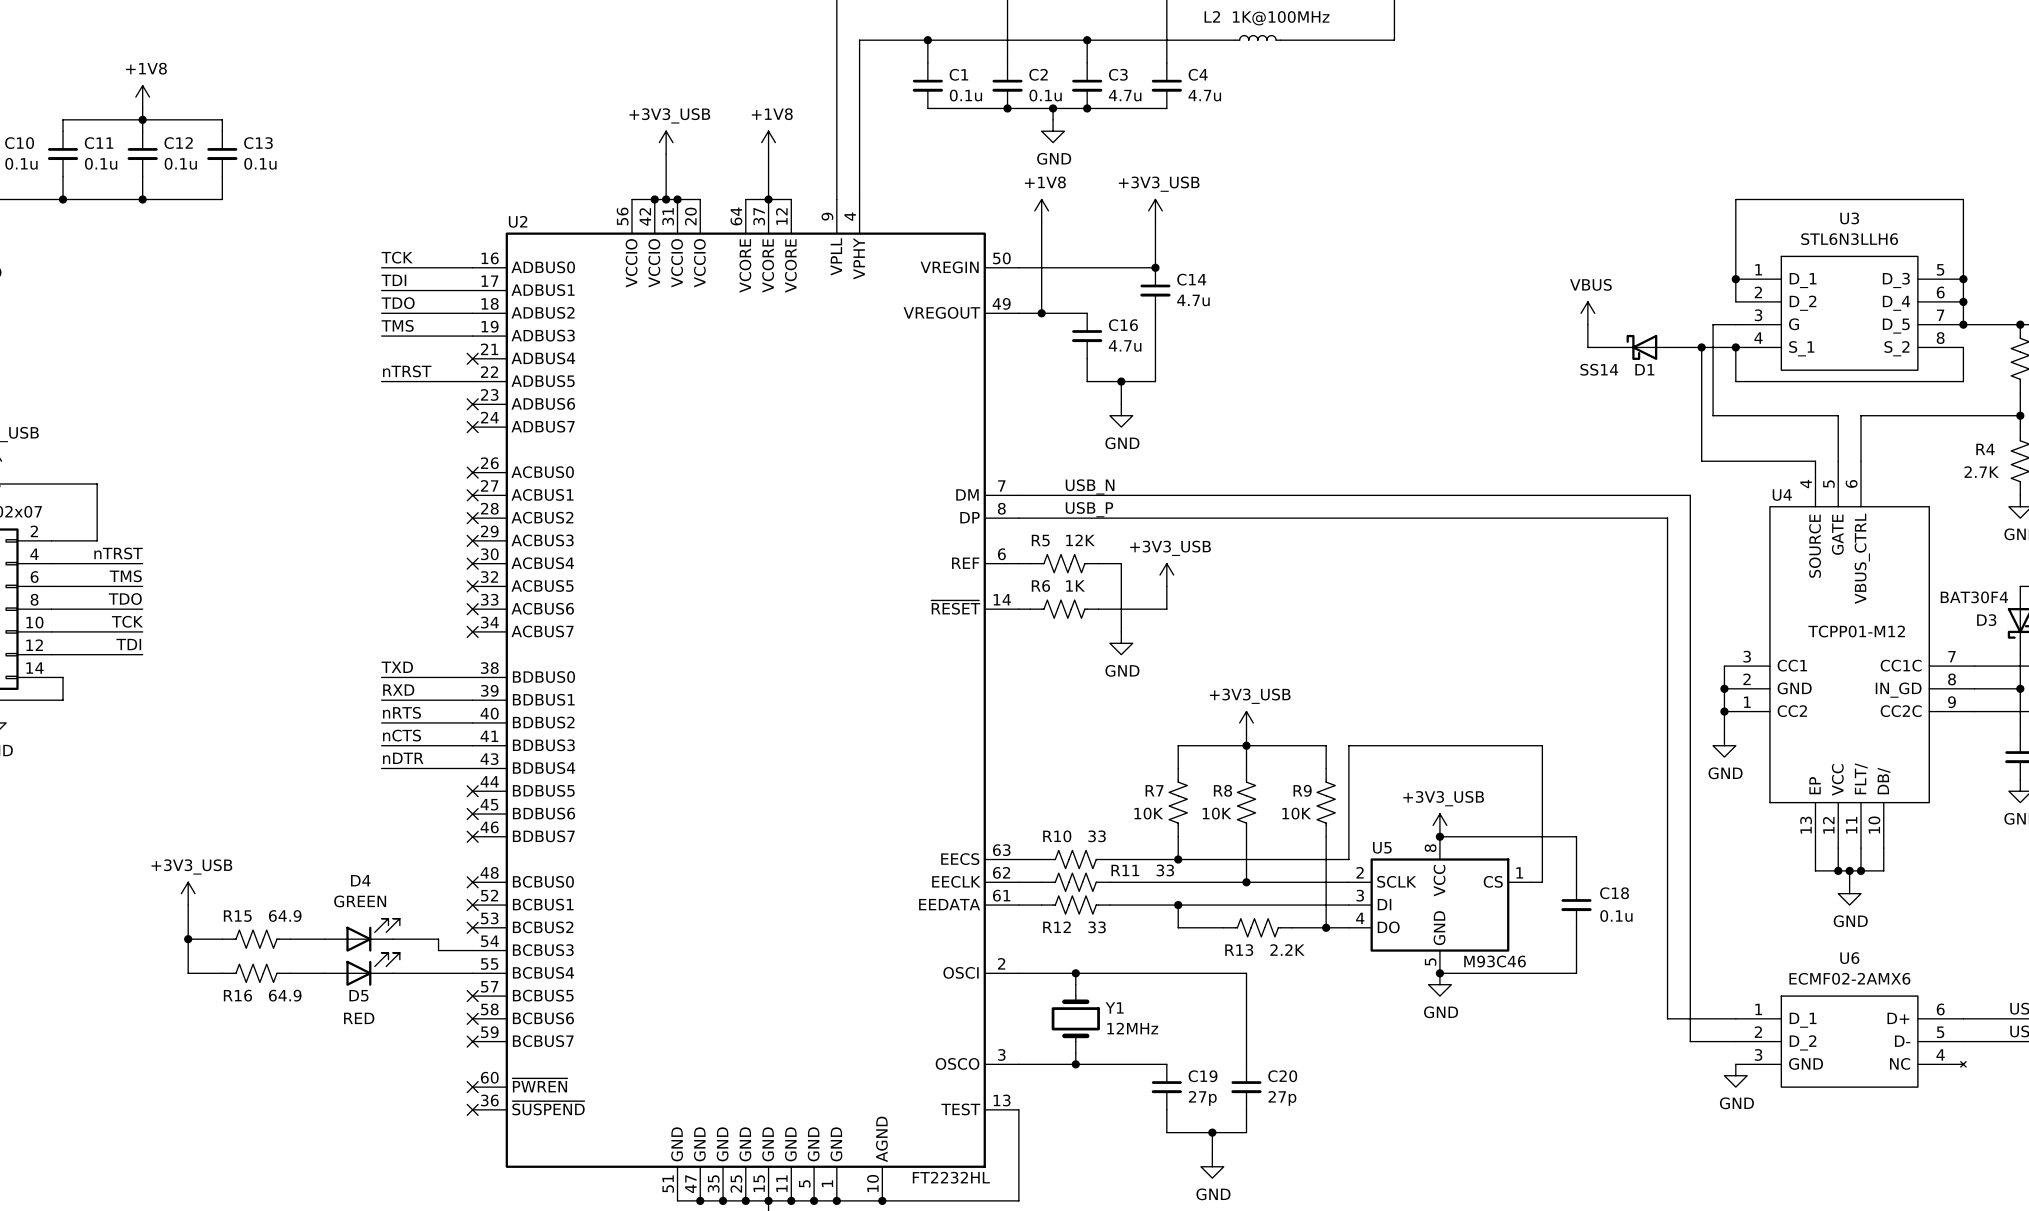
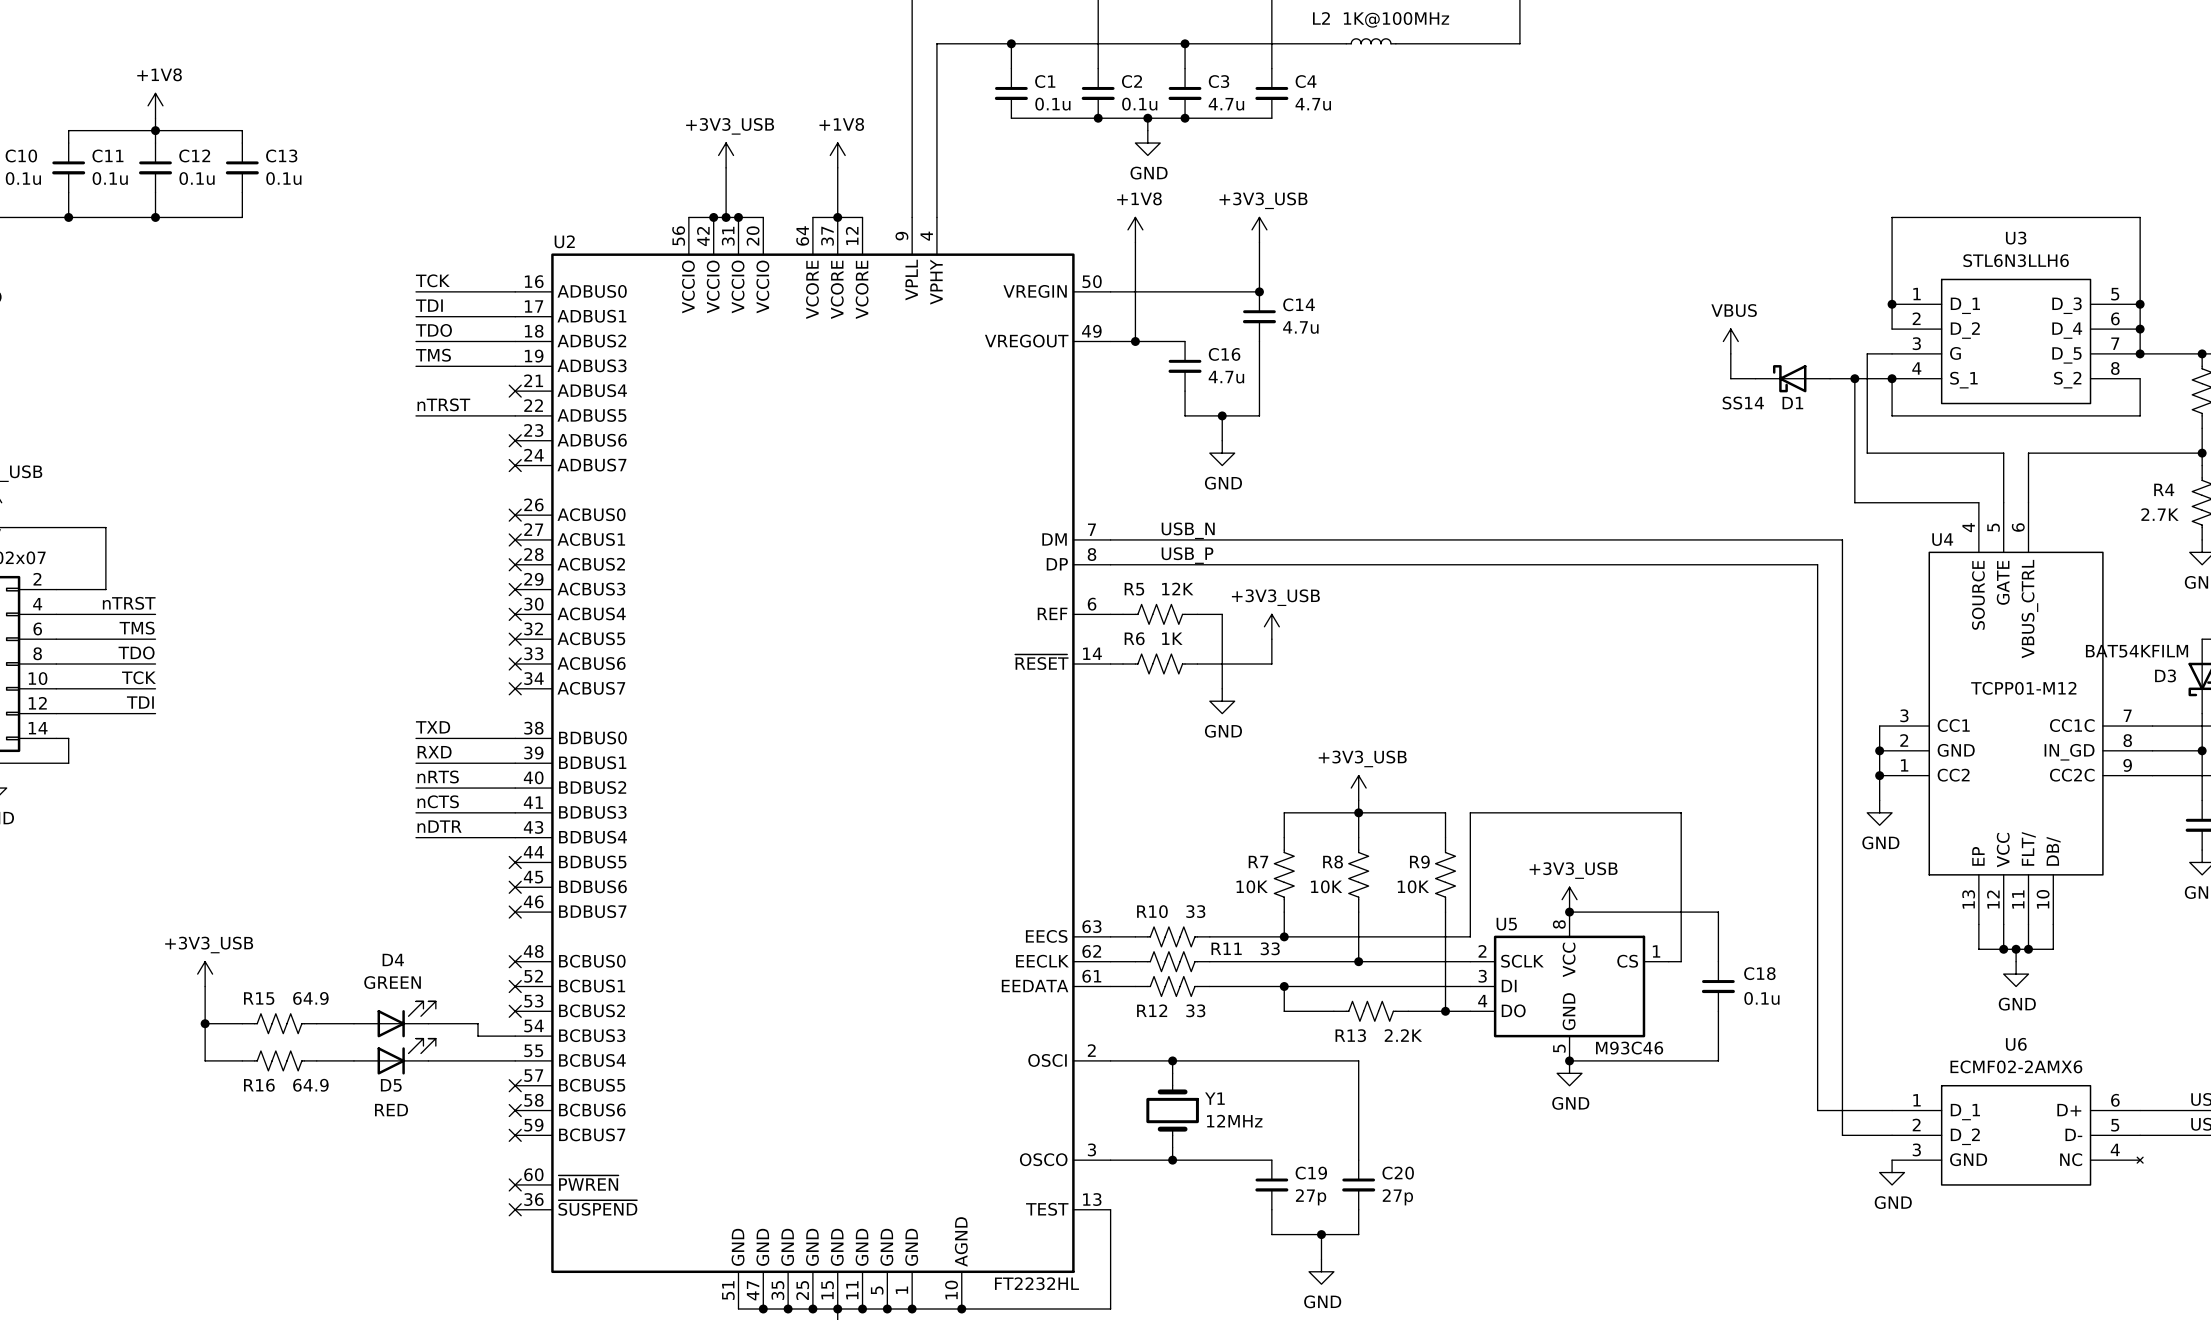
D3 value: BAT30F4 (1974, 597) -> BAT54KFILM (2137, 651)

